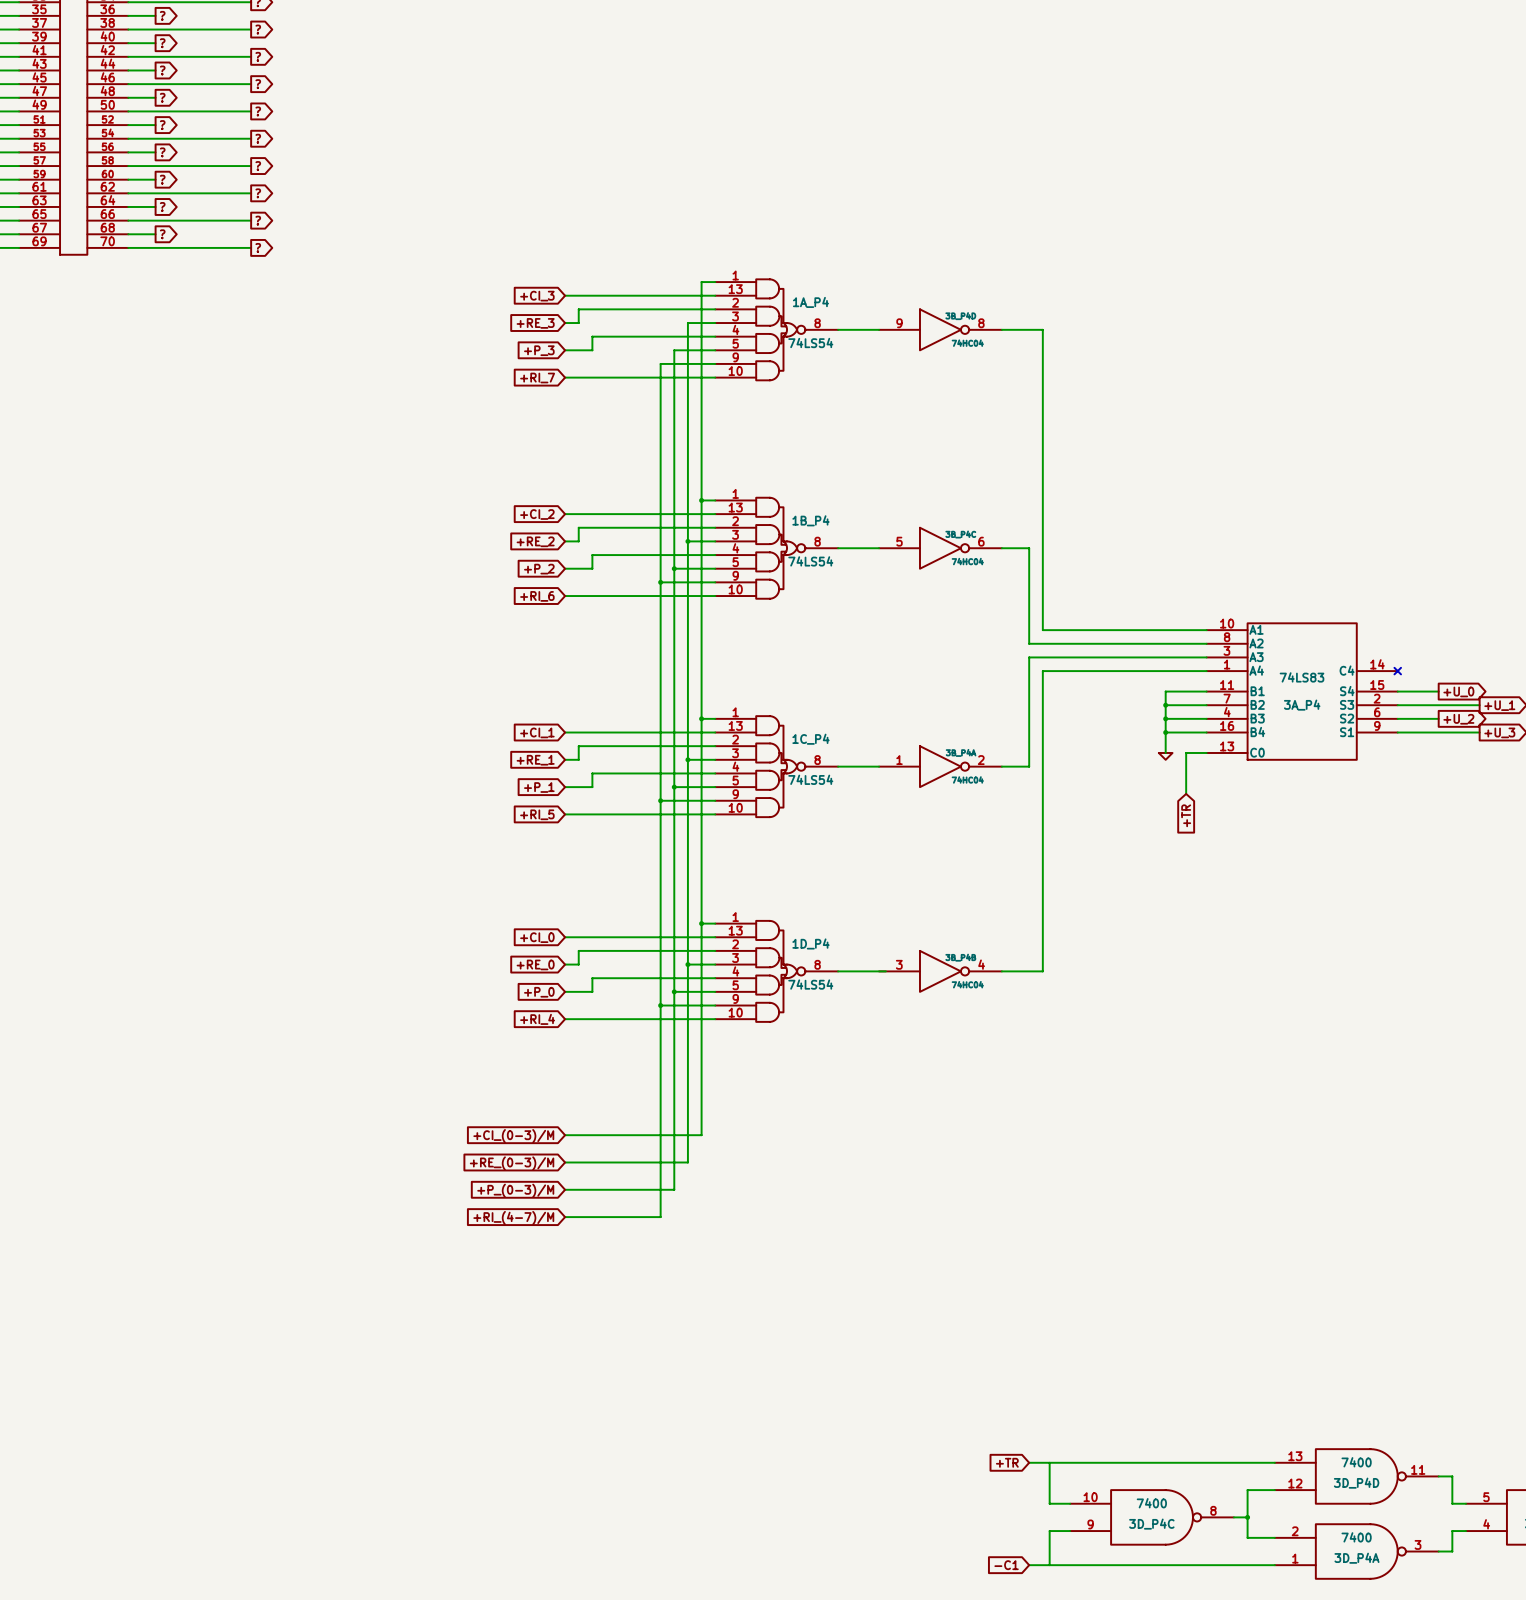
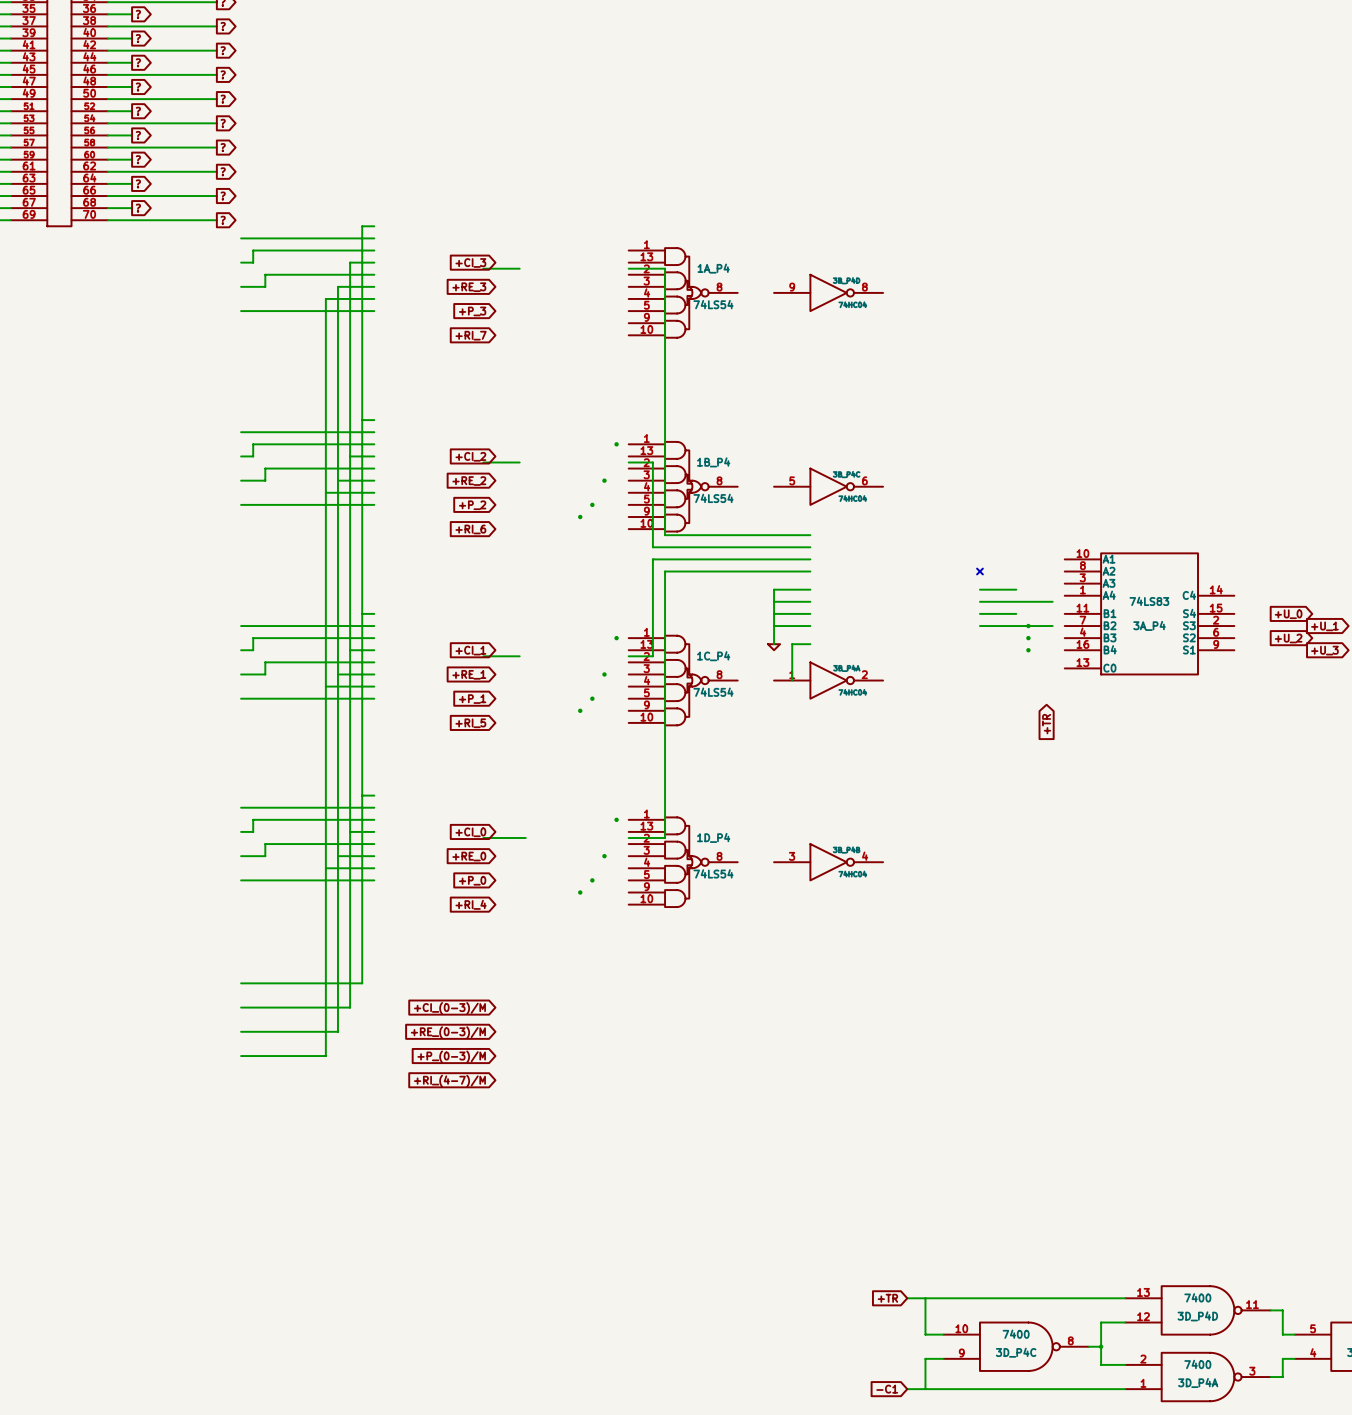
wire: none -> (374, 226) (362, 226) (362, 983) (241, 983)
wire: none -> (241, 238) (374, 238)
wire: none -> (374, 250) (253, 250) (253, 262) (241, 262)
wire: (715, 282) (701, 282) (701, 1135) (565, 1135) -> none
wire: none -> (374, 262) (350, 262) (350, 1007) (241, 1007)
wire: (565, 295) (715, 295) -> none
wire: none -> (483, 268) (519, 268)
wire: none -> (628, 268) (665, 268) (665, 535) (810, 535)
wire: none -> (374, 274) (265, 274) (265, 286) (241, 286)
wire: (715, 309) (578, 309) (578, 323) (565, 323) -> none
wire: none -> (374, 286) (337, 286) (337, 1031) (241, 1031)
wire: (715, 323) (687, 323) (687, 1162) (565, 1162) -> none
wire: (838, 329) (879, 329) -> none
wire: (1001, 329) (1042, 329) (1042, 630) (1206, 630) -> none
wire: none -> (374, 298) (325, 298) (325, 1056) (241, 1056)
wire: (715, 336) (592, 336) (592, 350) (565, 350) -> none
wire: none -> (241, 311) (374, 311)
wire: (715, 350) (674, 350) (674, 1189) (565, 1189) -> none
wire: (715, 363) (660, 363) (660, 1217) (565, 1217) -> none
wire: (565, 377) (715, 377) -> none
wire: none -> (362, 420) (374, 420)
wire: none -> (241, 432) (374, 432)
wire: none -> (374, 444) (253, 444) (253, 456) (241, 456)
wire: (701, 500) (715, 500) -> none
wire: none -> (350, 456) (374, 456)
wire: (565, 514) (715, 514) -> none
wire: none -> (628, 462) (652, 462) (652, 547) (810, 547)
wire: none -> (374, 468) (265, 468) (265, 480) (241, 480)
wire: (715, 527) (578, 527) (578, 541) (565, 541) -> none
wire: none -> (337, 480) (374, 480)
wire: (687, 541) (715, 541) -> none
wire: (838, 548) (879, 548) -> none
wire: (1001, 548) (1029, 548) (1029, 643) (1206, 643) -> none
wire: none -> (325, 492) (374, 492)
wire: (715, 555) (592, 555) (592, 568) (565, 568) -> none
wire: none -> (241, 504) (374, 504)
wire: (674, 568) (715, 568) -> (483, 462) (519, 462)
wire: (660, 582) (715, 582) -> none
wire: (565, 596) (715, 596) -> none
wire: none -> (810, 559) (652, 559) (652, 656) (628, 656)
wire: none -> (810, 571) (665, 571) (665, 838) (628, 838)
no-connect mark: none -> (979, 571)
wire: (1206, 657) (1029, 657) (1029, 766) (1001, 766) -> none
wire: none -> (810, 589) (774, 589) (774, 644)
wire: (1206, 671) (1042, 671) (1042, 971) (1001, 971) -> none
no-connect mark: (1397, 671) -> none
wire: none -> (774, 601) (810, 601)
wire: none -> (979, 601) (1052, 601)
wire: none -> (362, 613) (374, 613)
wire: none -> (774, 613) (810, 613)
wire: (1206, 691) (1165, 691) (1165, 752) -> none
wire: (1397, 691) (1438, 691) -> none
wire: none -> (241, 626) (374, 626)
wire: none -> (979, 626) (1028, 626)
wire: (1192, 705) (1206, 705) -> none
wire: (1397, 705) (1479, 705) -> none
wire: none -> (374, 638) (253, 638) (253, 650) (241, 650)
wire: (701, 718) (715, 718) -> none
wire: (1165, 718) (1206, 718) -> (979, 613) (1016, 613)
wire: (1397, 718) (1438, 718) -> none
wire: none -> (810, 644) (792, 644) (792, 680)
power symbol: none -> (774, 647)
wire: none -> (350, 650) (374, 650)
wire: (565, 732) (715, 732) -> none
wire: (1165, 732) (1206, 732) -> (979, 589) (1016, 589)
wire: (1397, 732) (1479, 732) -> none
wire: none -> (374, 662) (265, 662) (265, 674) (241, 674)
wire: (715, 746) (578, 746) (578, 759) (565, 759) -> none
wire: (1206, 752) (1186, 752) (1186, 793) -> none
power symbol: (1165, 756) -> none
wire: none -> (337, 674) (374, 674)
wire: (687, 759) (715, 759) -> none
wire: (838, 766) (879, 766) -> (774, 626) (810, 626)
wire: none -> (325, 686) (374, 686)
wire: (715, 773) (592, 773) (592, 787) (565, 787) -> none
wire: none -> (241, 698) (374, 698)
wire: (674, 787) (715, 787) -> (483, 656) (519, 656)
wire: (660, 800) (715, 800) -> none
wire: (565, 814) (715, 814) -> none
wire: none -> (362, 795) (374, 795)
wire: none -> (241, 807) (374, 807)
wire: none -> (374, 819) (253, 819) (253, 831) (241, 831)
wire: (701, 923) (715, 923) -> none
wire: none -> (350, 831) (374, 831)
wire: (565, 937) (715, 937) -> none
wire: none -> (483, 838) (525, 838)
wire: none -> (374, 844) (265, 844) (265, 856) (241, 856)
wire: (715, 950) (578, 950) (578, 964) (565, 964) -> none
wire: none -> (337, 856) (374, 856)
wire: (687, 964) (715, 964) -> none
wire: (838, 971) (885, 971) -> none
wire: none -> (325, 868) (374, 868)
wire: (715, 978) (592, 978) (592, 991) (565, 991) -> none
wire: none -> (241, 880) (374, 880)
wire: (674, 991) (715, 991) -> none
wire: (660, 1005) (715, 1005) -> none
wire: (565, 1019) (715, 1019) -> none

